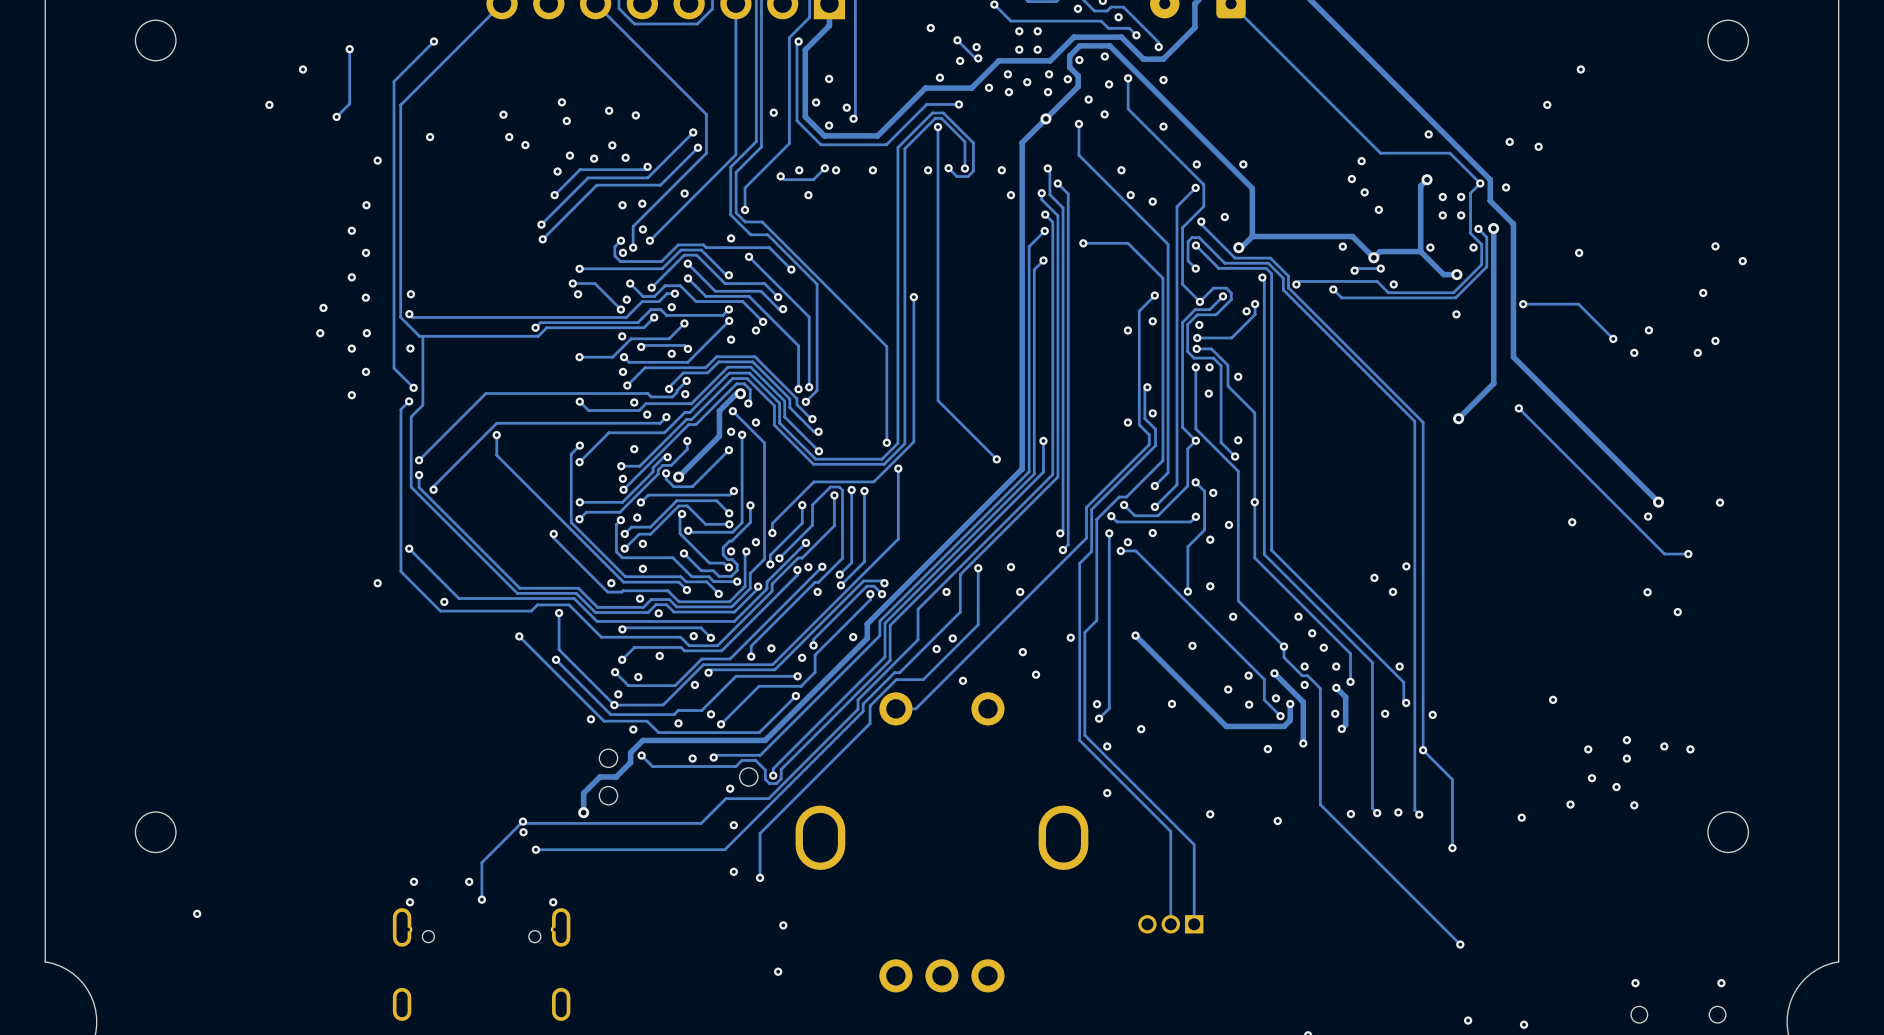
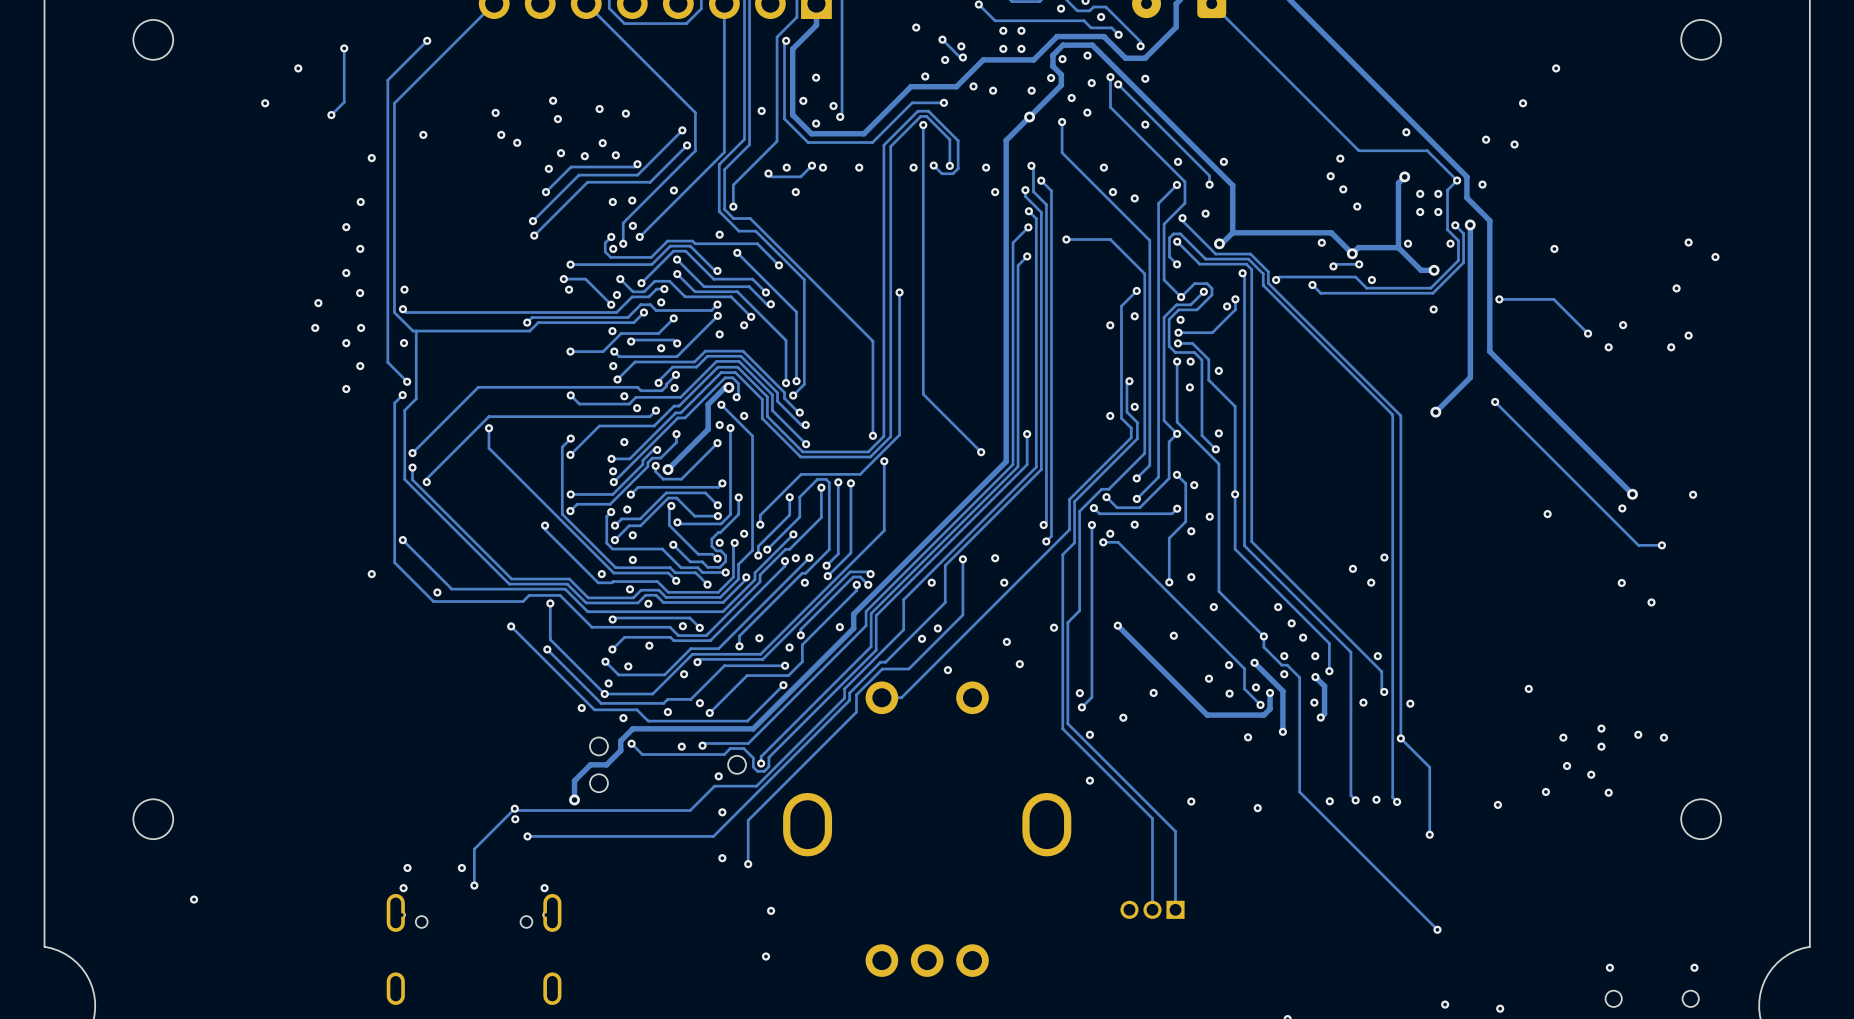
via: (1007, 74) -> none
via: (1049, 74) -> none
via: (1027, 82) -> none
track: none -> (1118, 84) (1209, 175) (1209, 184)
via: none -> (1118, 84)
via: none -> (1209, 184)

